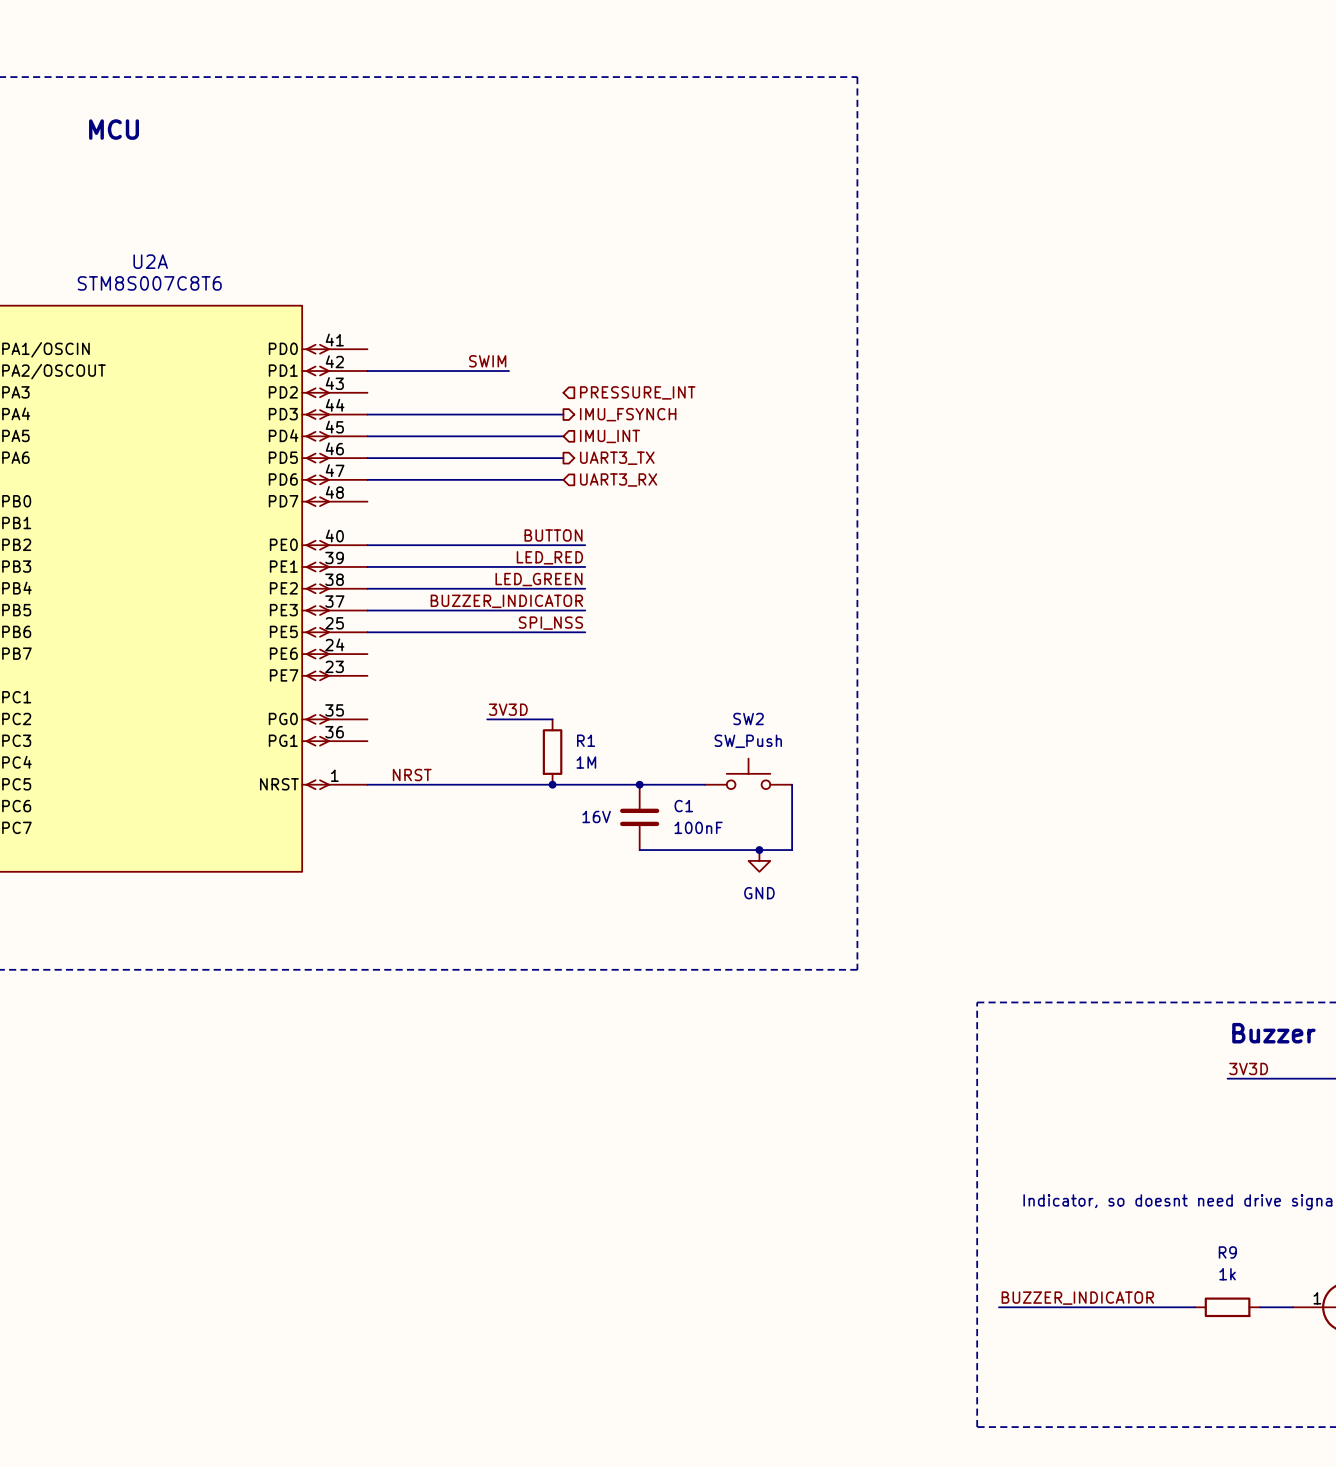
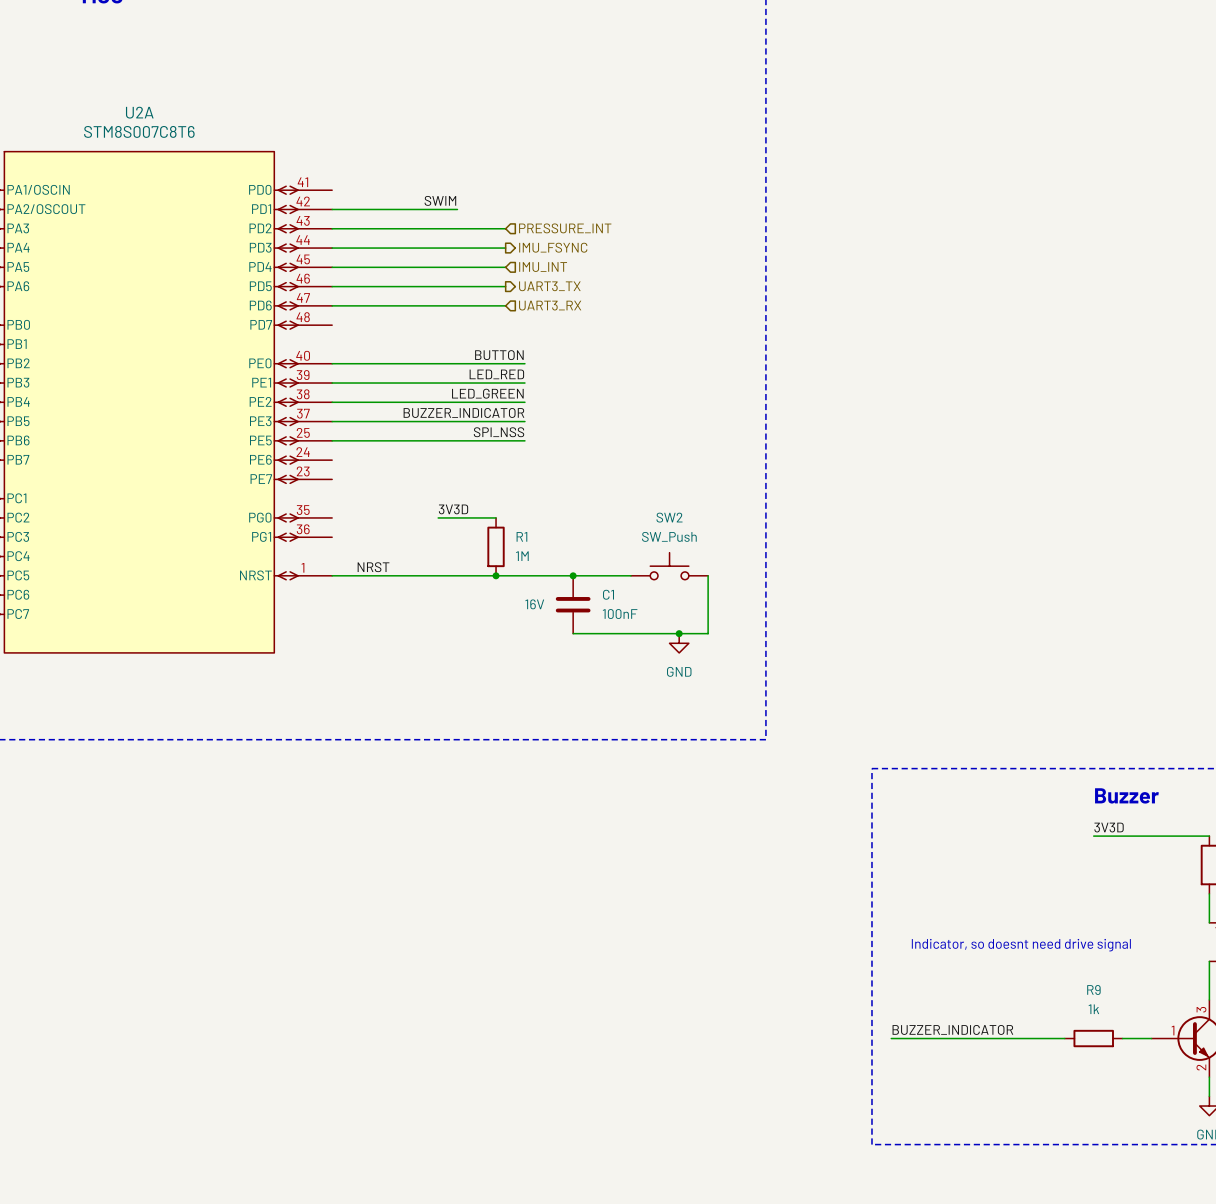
wire: none -> (332, 228) (505, 228)
hierarchical label: IMU_FSYNCH (628, 414) -> IMU_FSYNC (553, 247)

